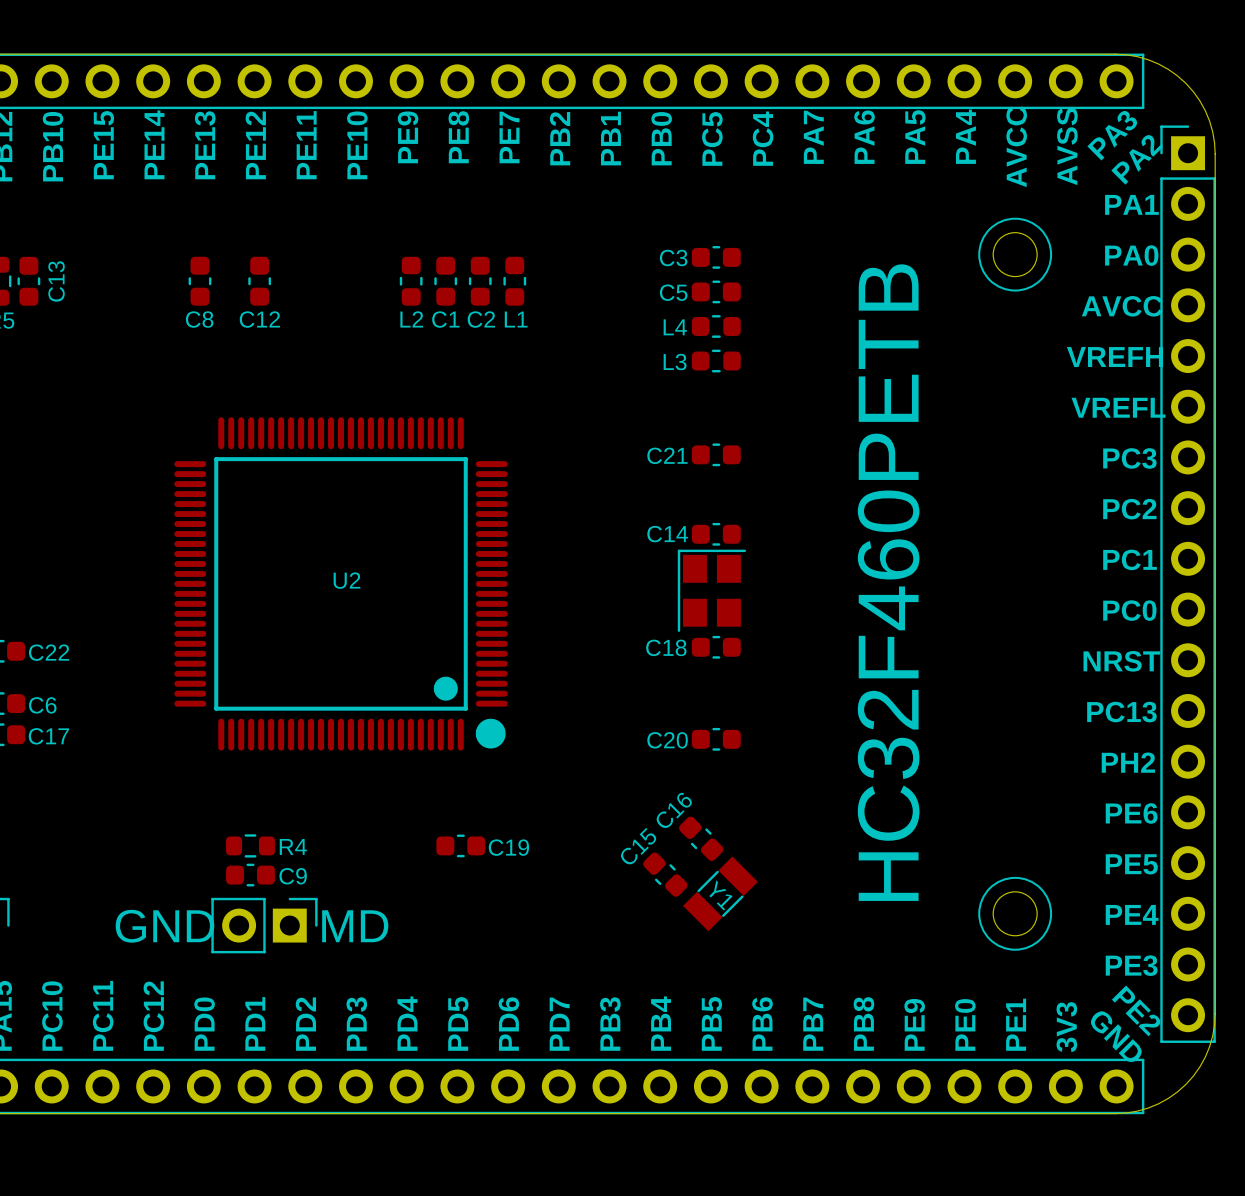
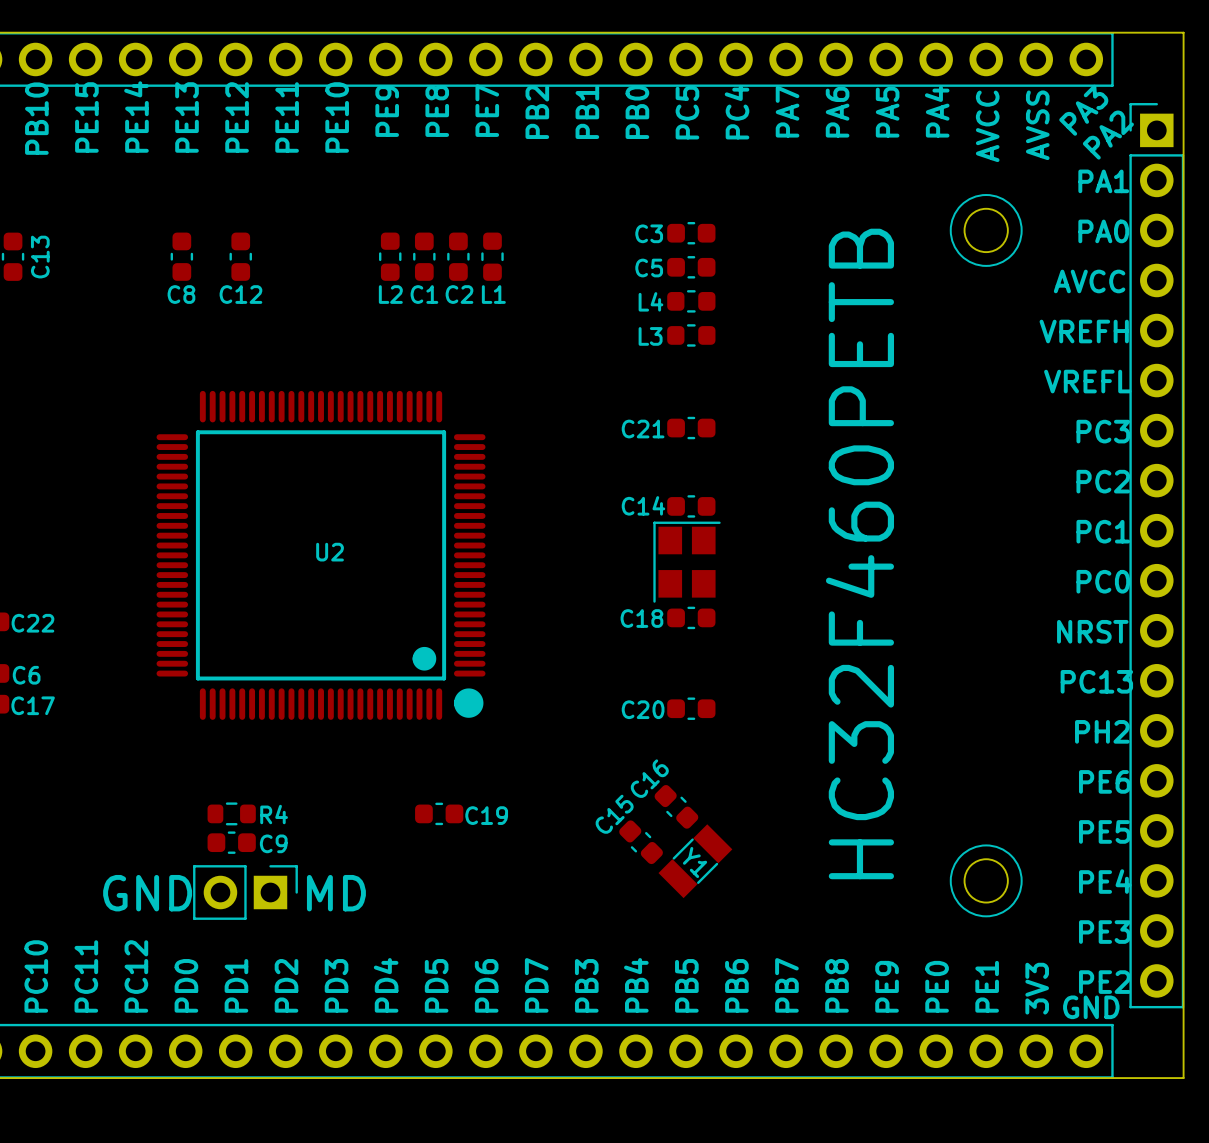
board edge: (1115, 54) (1137, 56) (1158, 64) (1185, 83) (1205, 110) (1212, 131) (1215, 154) -> (1085, 32) (1183, 32) (1183, 131)
text rotation: 0° (1136, 1010) -> 45° counterclockwise (1104, 982)
board edge: (1215, 1013) (1212, 1036) (1205, 1057) (1185, 1084) (1158, 1103) (1137, 1111) (1115, 1113) -> (1183, 979) (1183, 1078) (1085, 1078)
text rotation: 0° (1116, 1036) -> 45° counterclockwise (1091, 1007)

